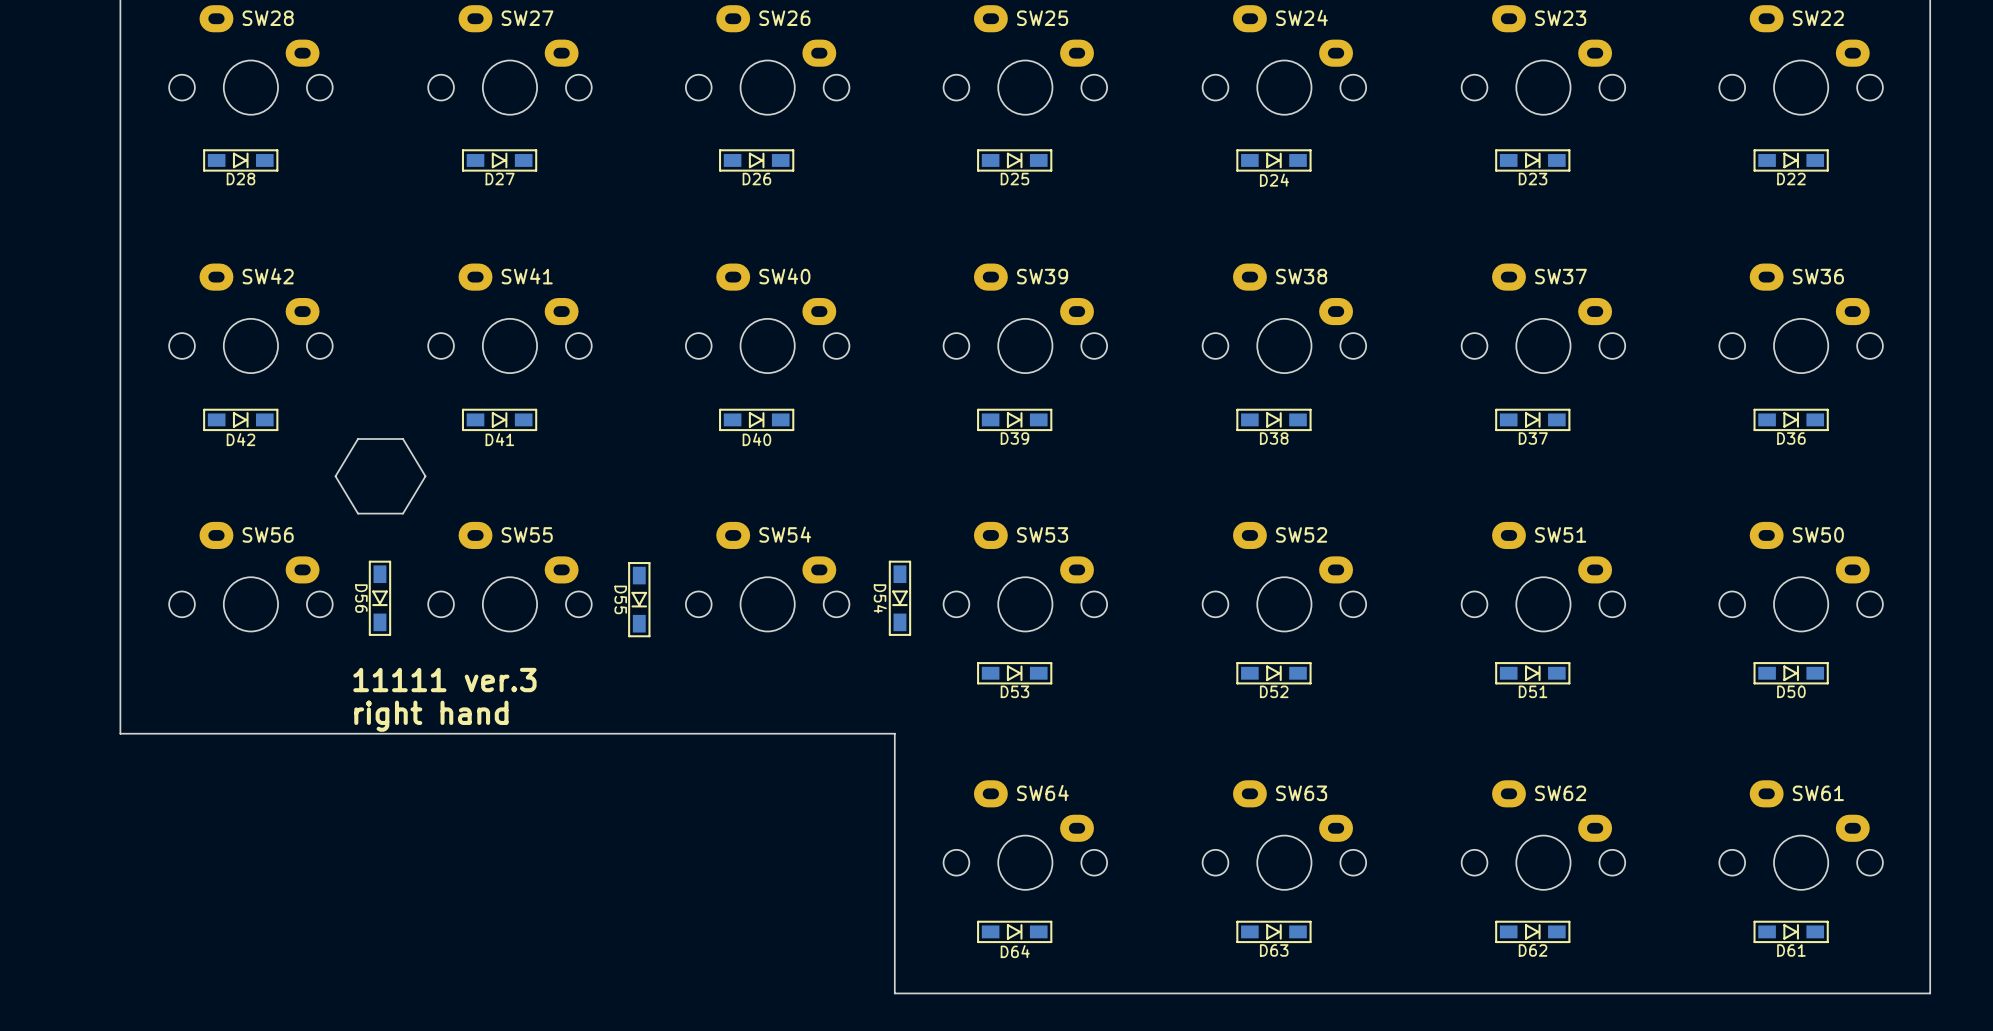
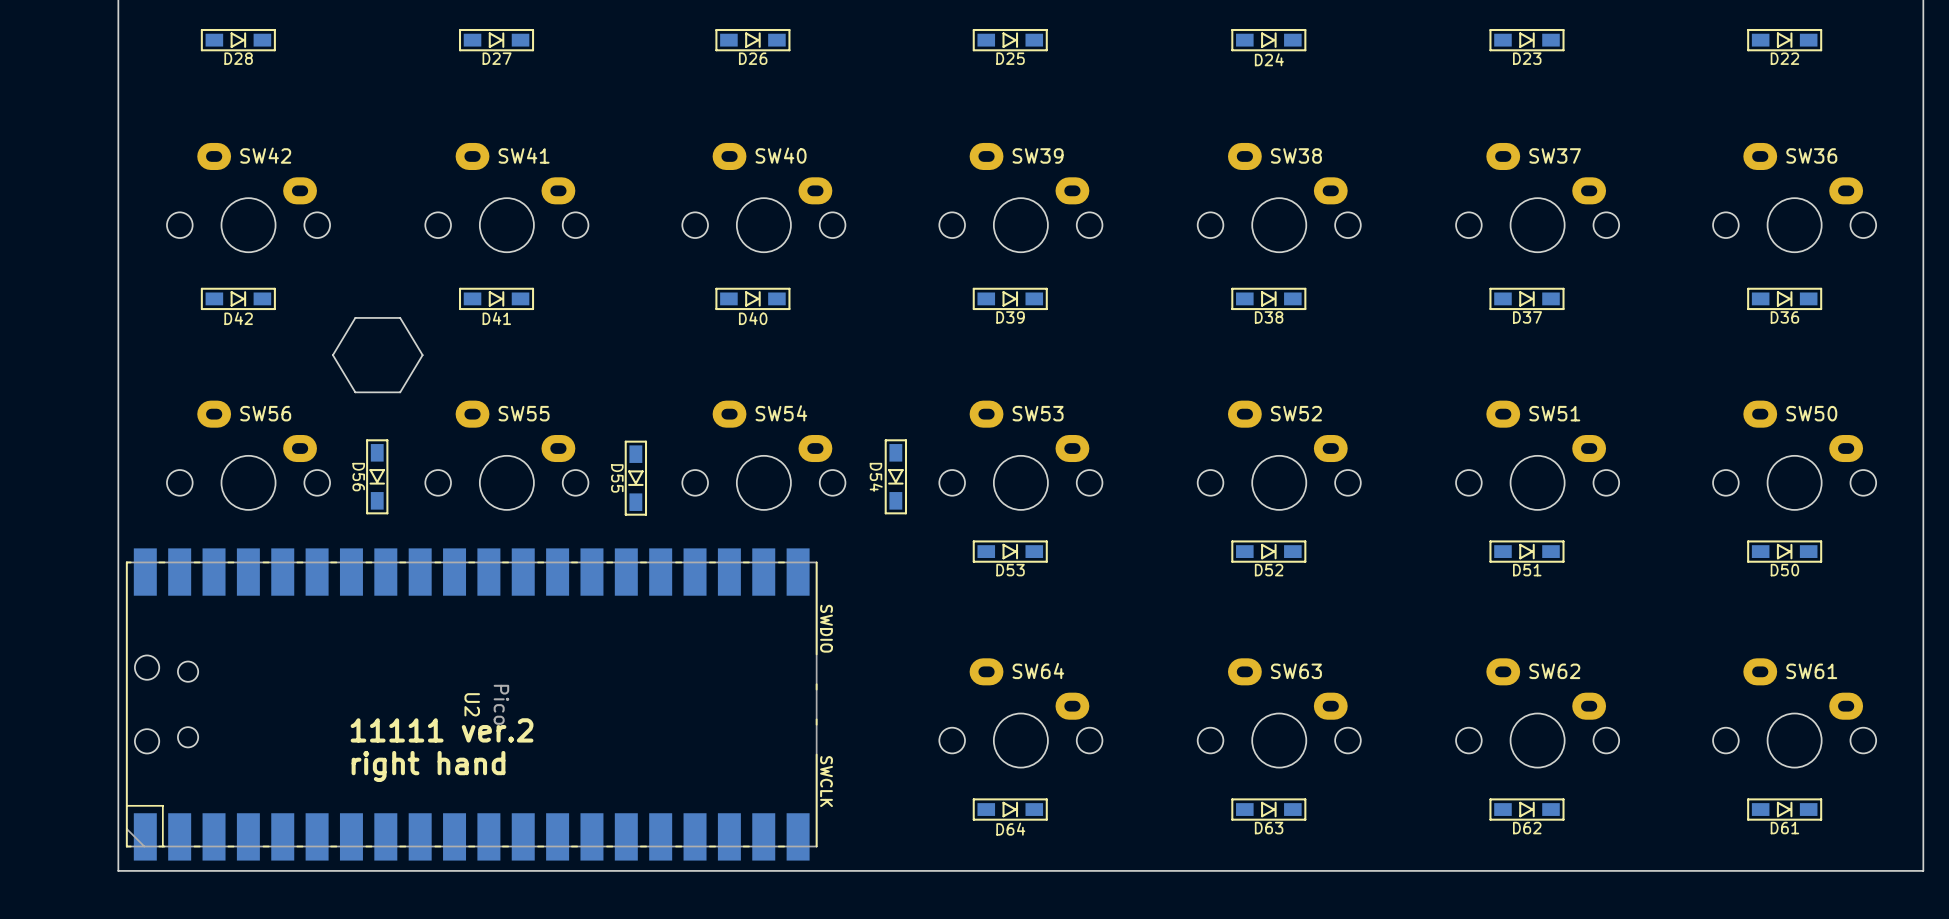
text: 11111 ver.3 (444, 680) -> none
text position: right hand (431, 716) -> right hand (428, 766)
board edge: (120, 733) (894, 733) (894, 993) -> (118, 611) (118, 870) (890, 870)
U2: none -> Pico (471, 704)
text: none -> 11111 ver.2 (442, 730)

